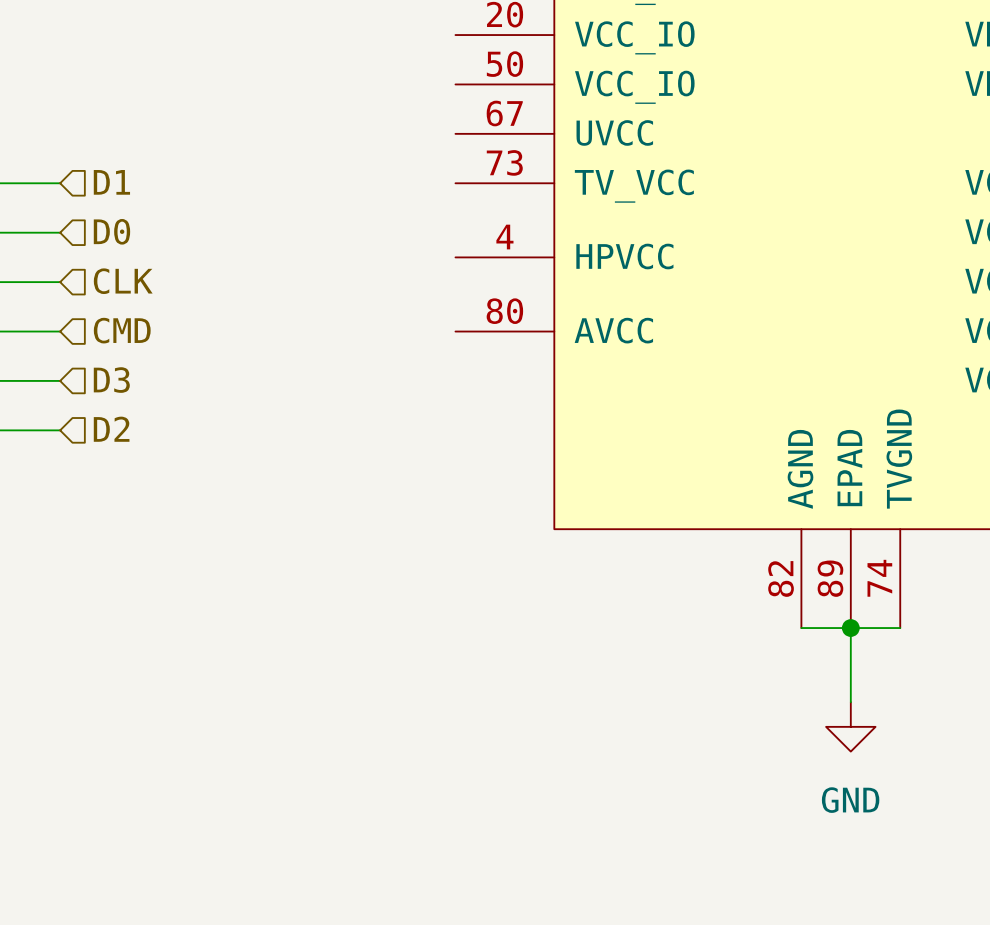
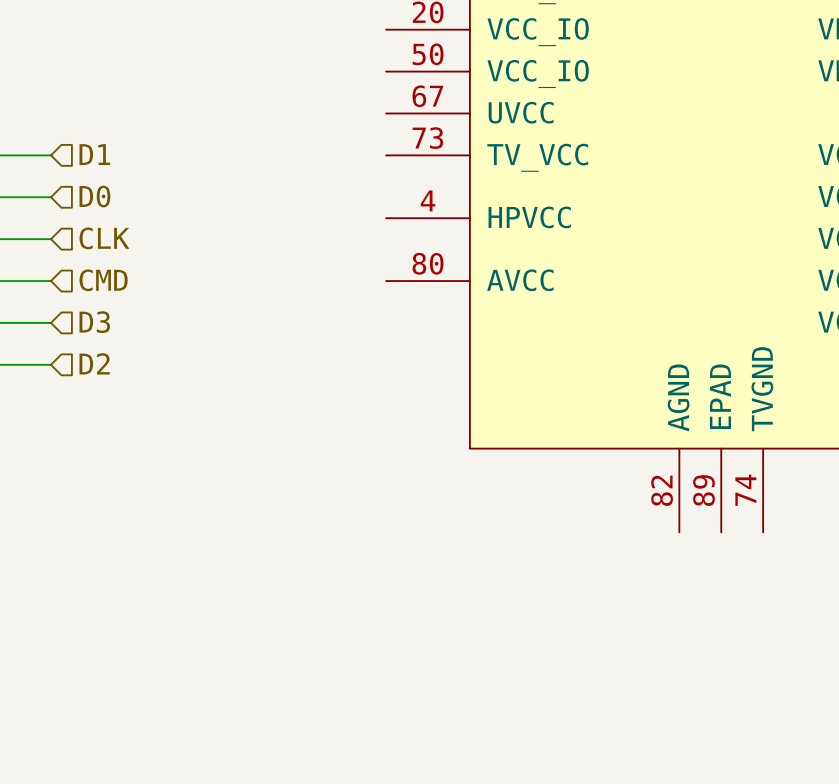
wire: (801, 628) (900, 628) -> none
wire: (850, 628) (850, 702) -> none
junction: (850, 628) -> none
power symbol: GND (850, 726) -> none

